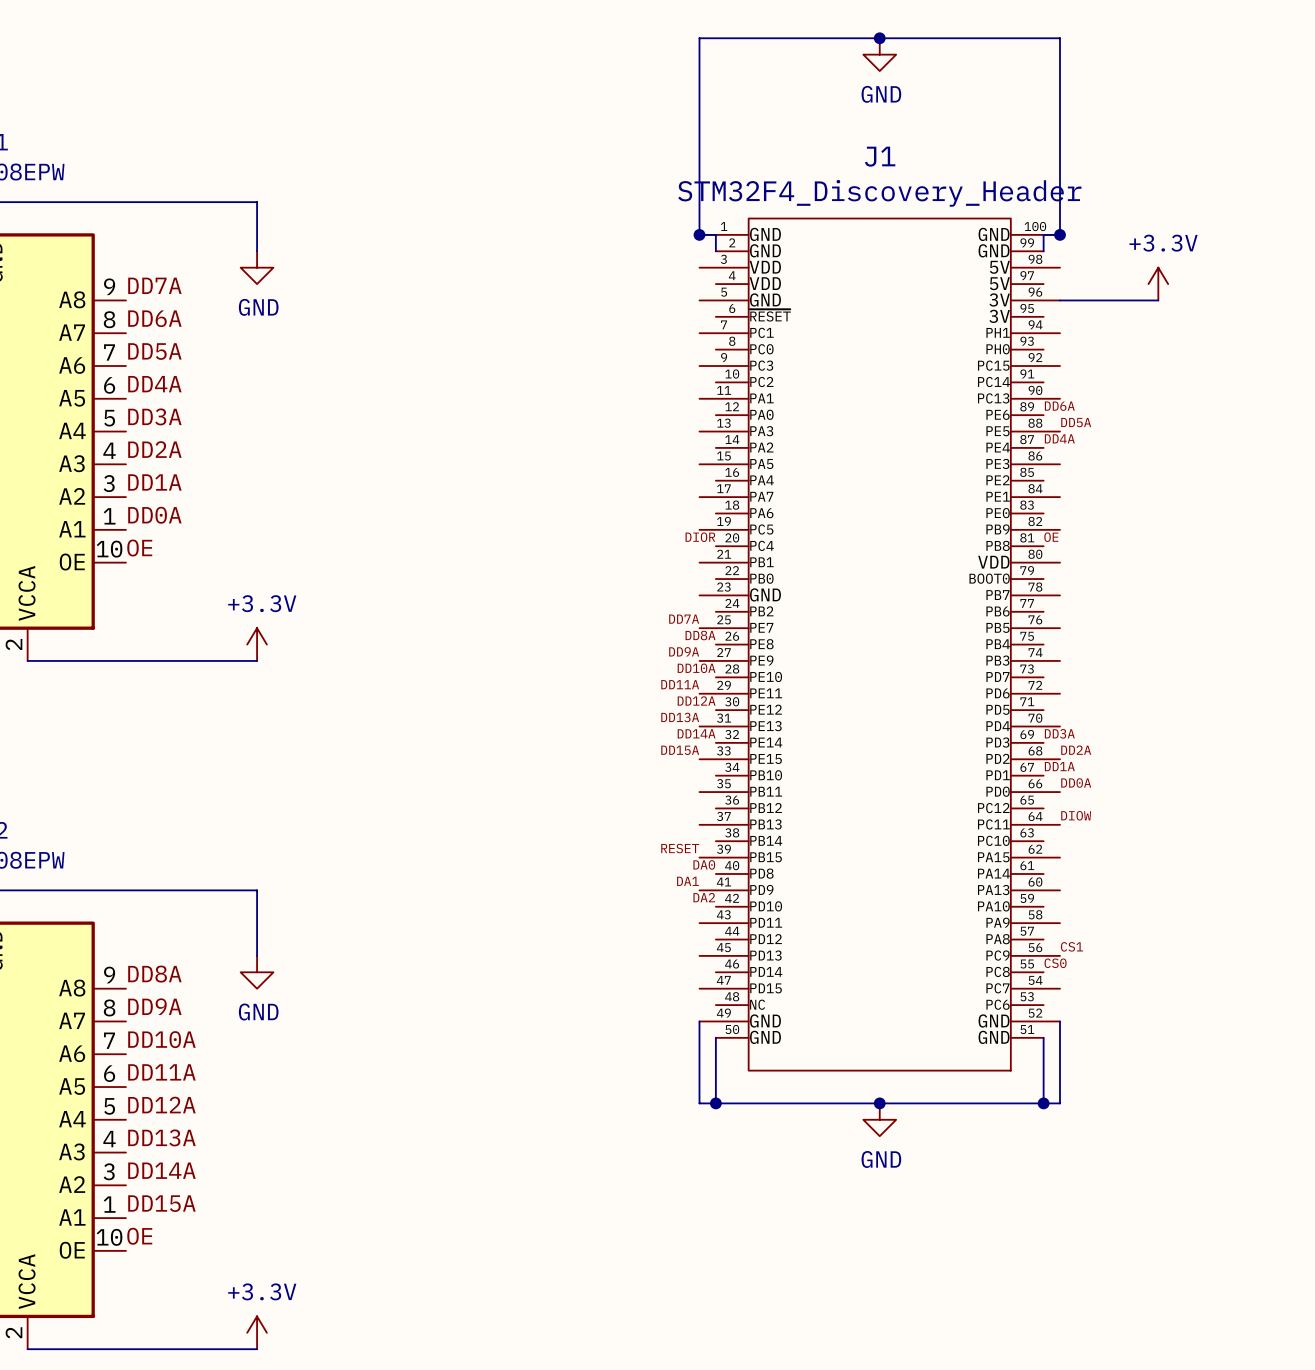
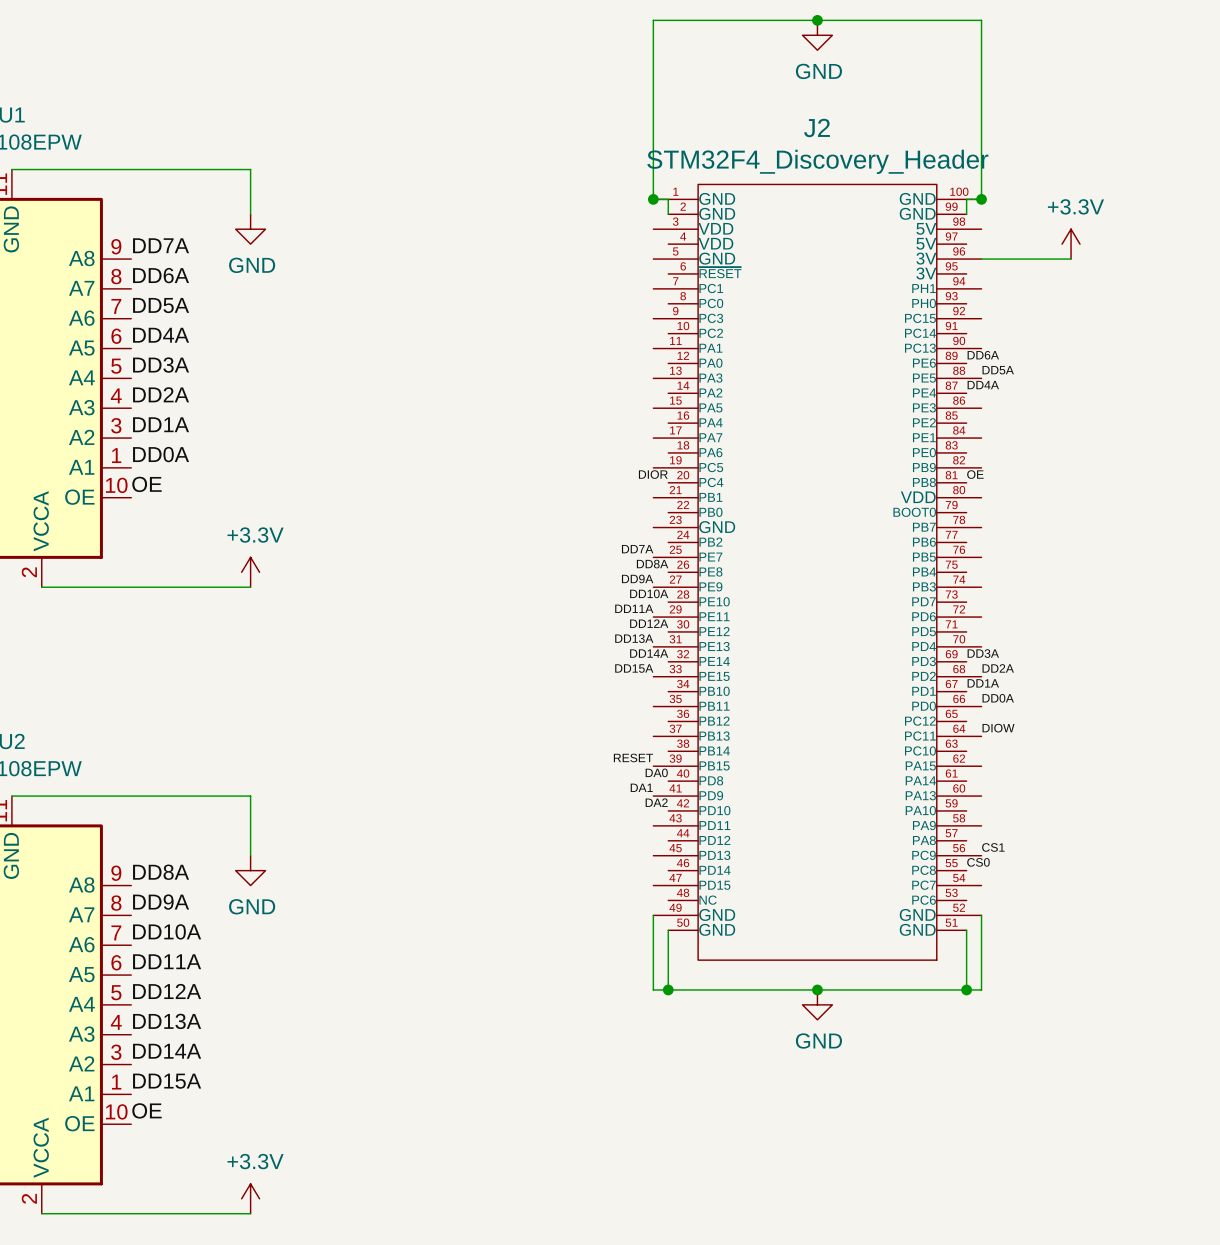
J1 name: J1 (880, 156) -> J2 (816, 127)

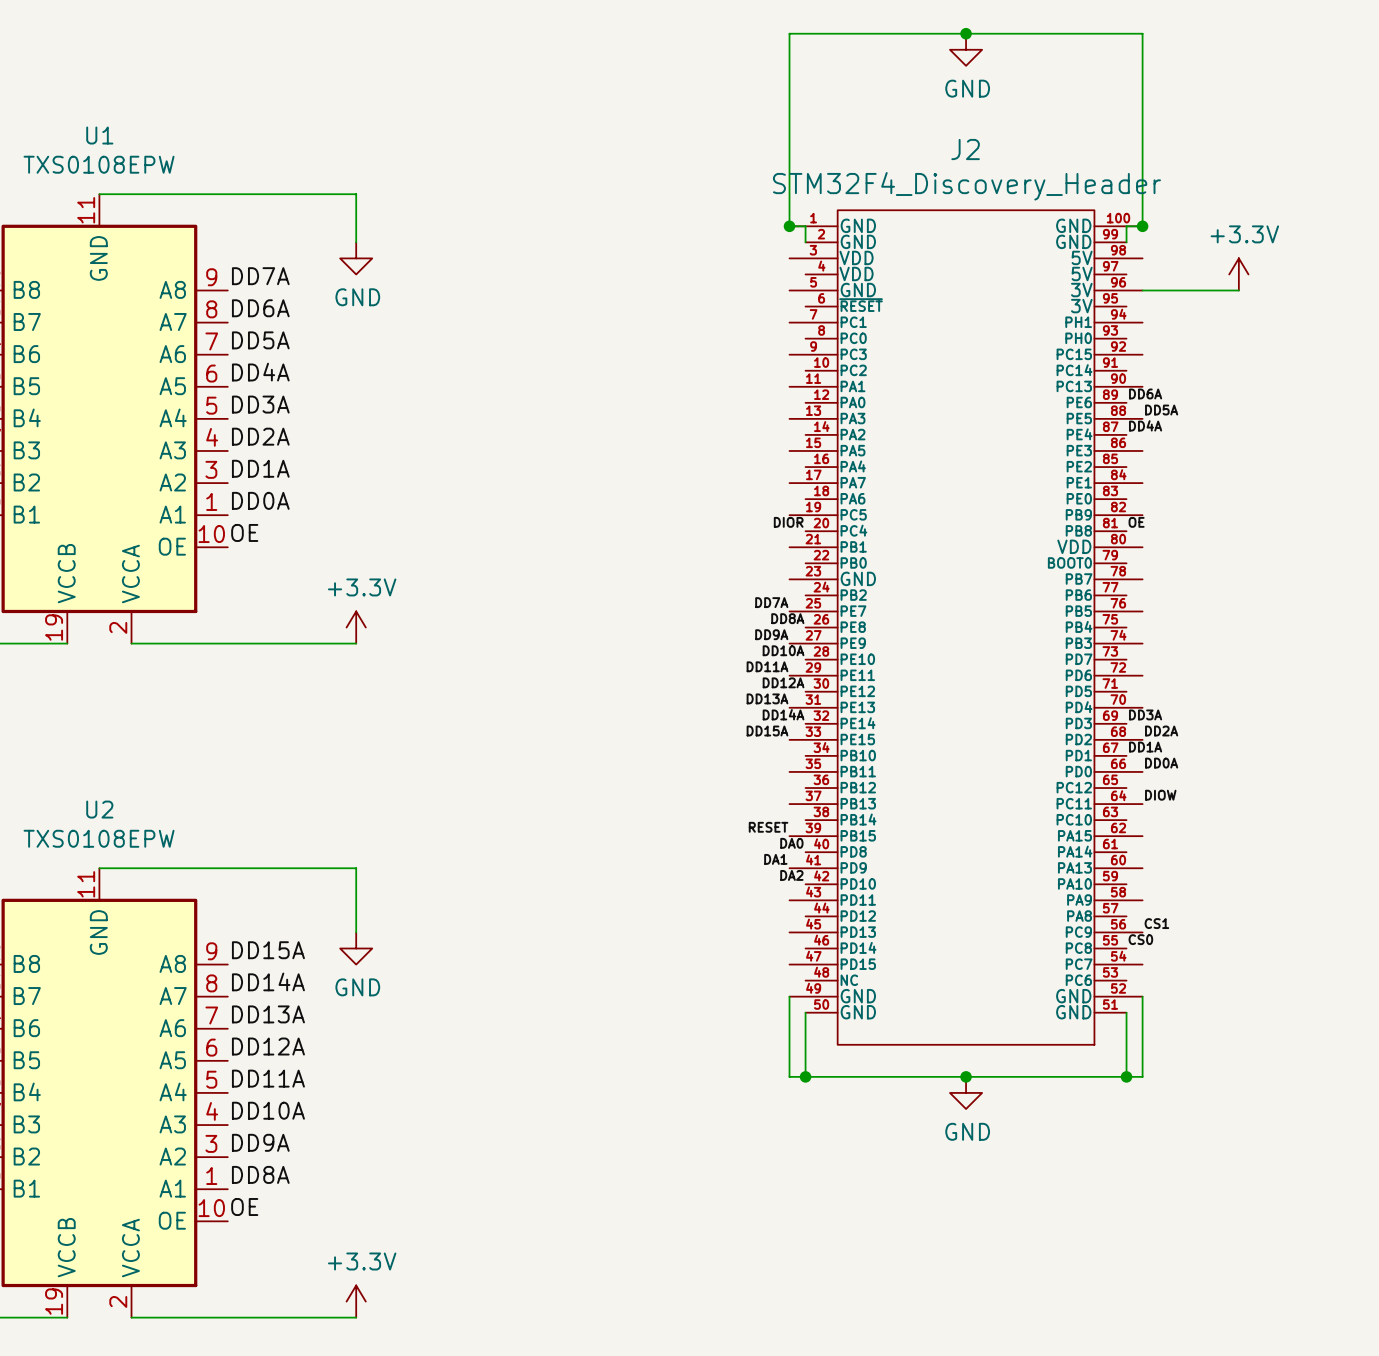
label: DD8A (161, 872) -> DD15A (268, 950)
label: DD9A (161, 902) -> DD14A (268, 981)
label: DD10A (167, 931) -> DD13A (268, 1014)
label: DD11A (167, 961) -> DD12A (268, 1046)
label: DD12A (167, 991) -> DD11A (268, 1078)
label: DD13A (167, 1021) -> DD10A (268, 1110)
label: DD14A (167, 1051) -> DD9A (260, 1142)
label: DD15A (167, 1081) -> DD8A (260, 1174)

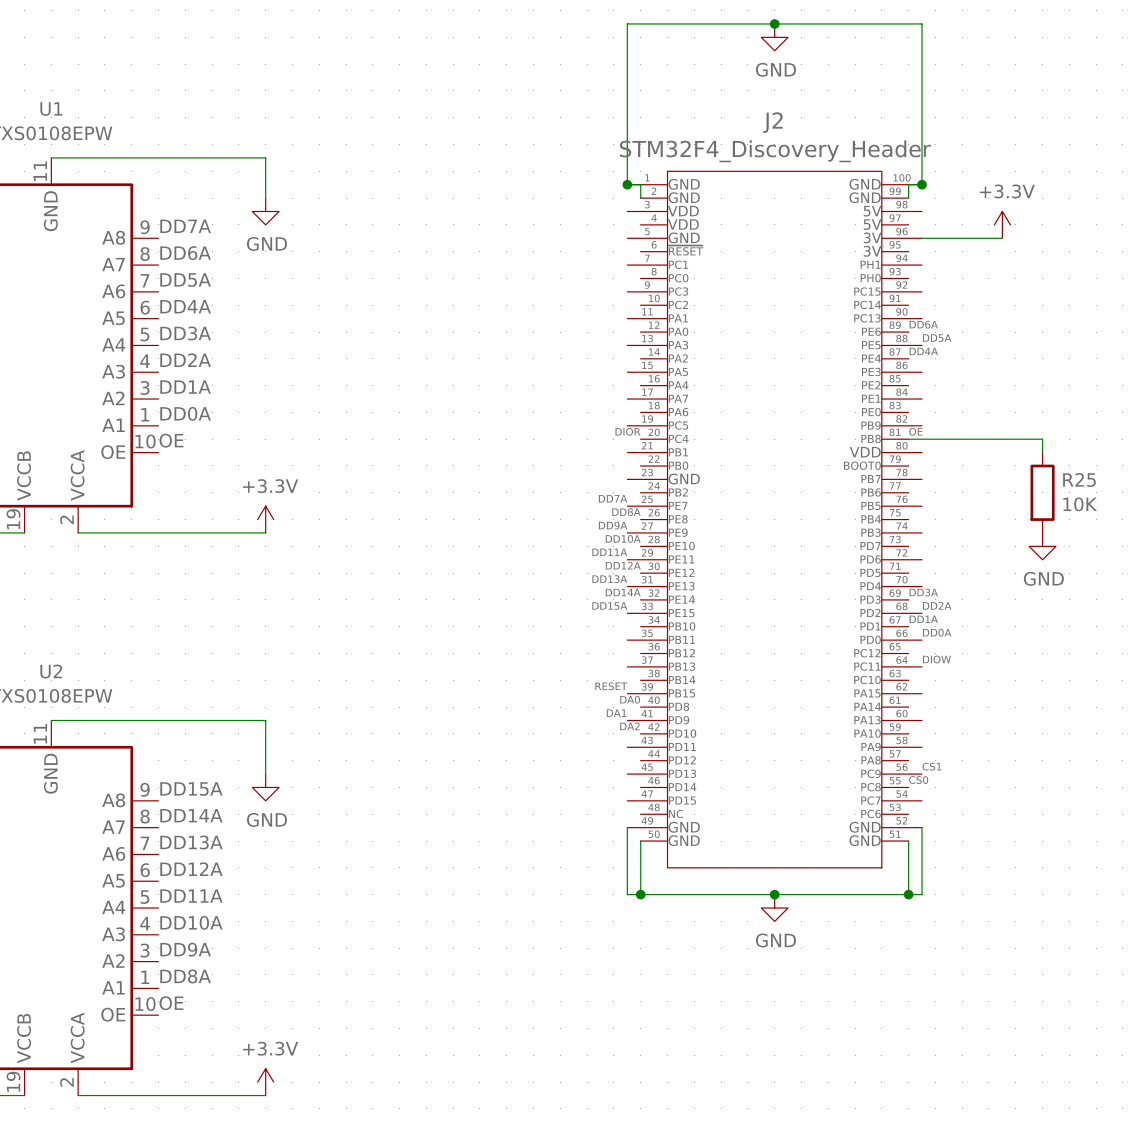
wire: none -> (908, 439) (1042, 439) (1042, 452)
R25: none -> 10K (1042, 492)
power symbol: none -> GND (1042, 546)

